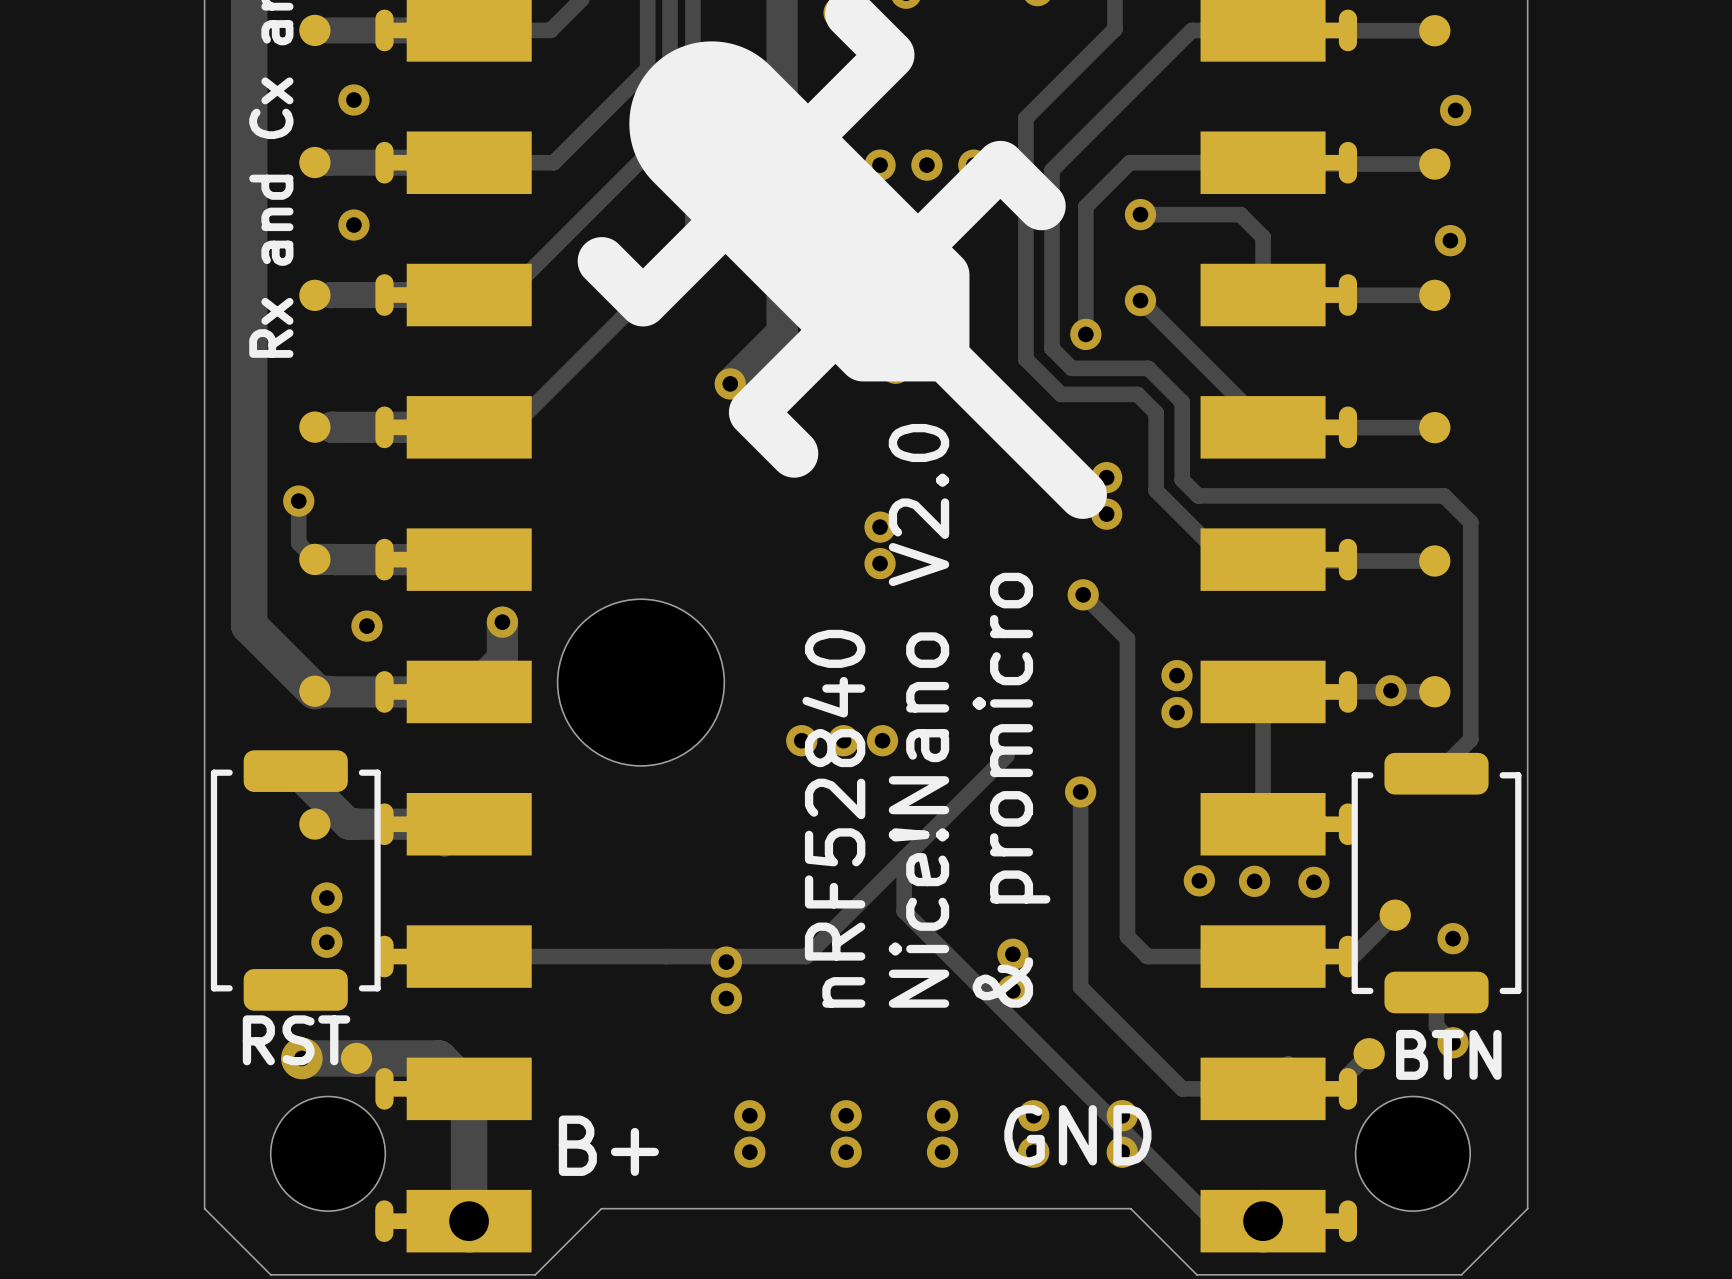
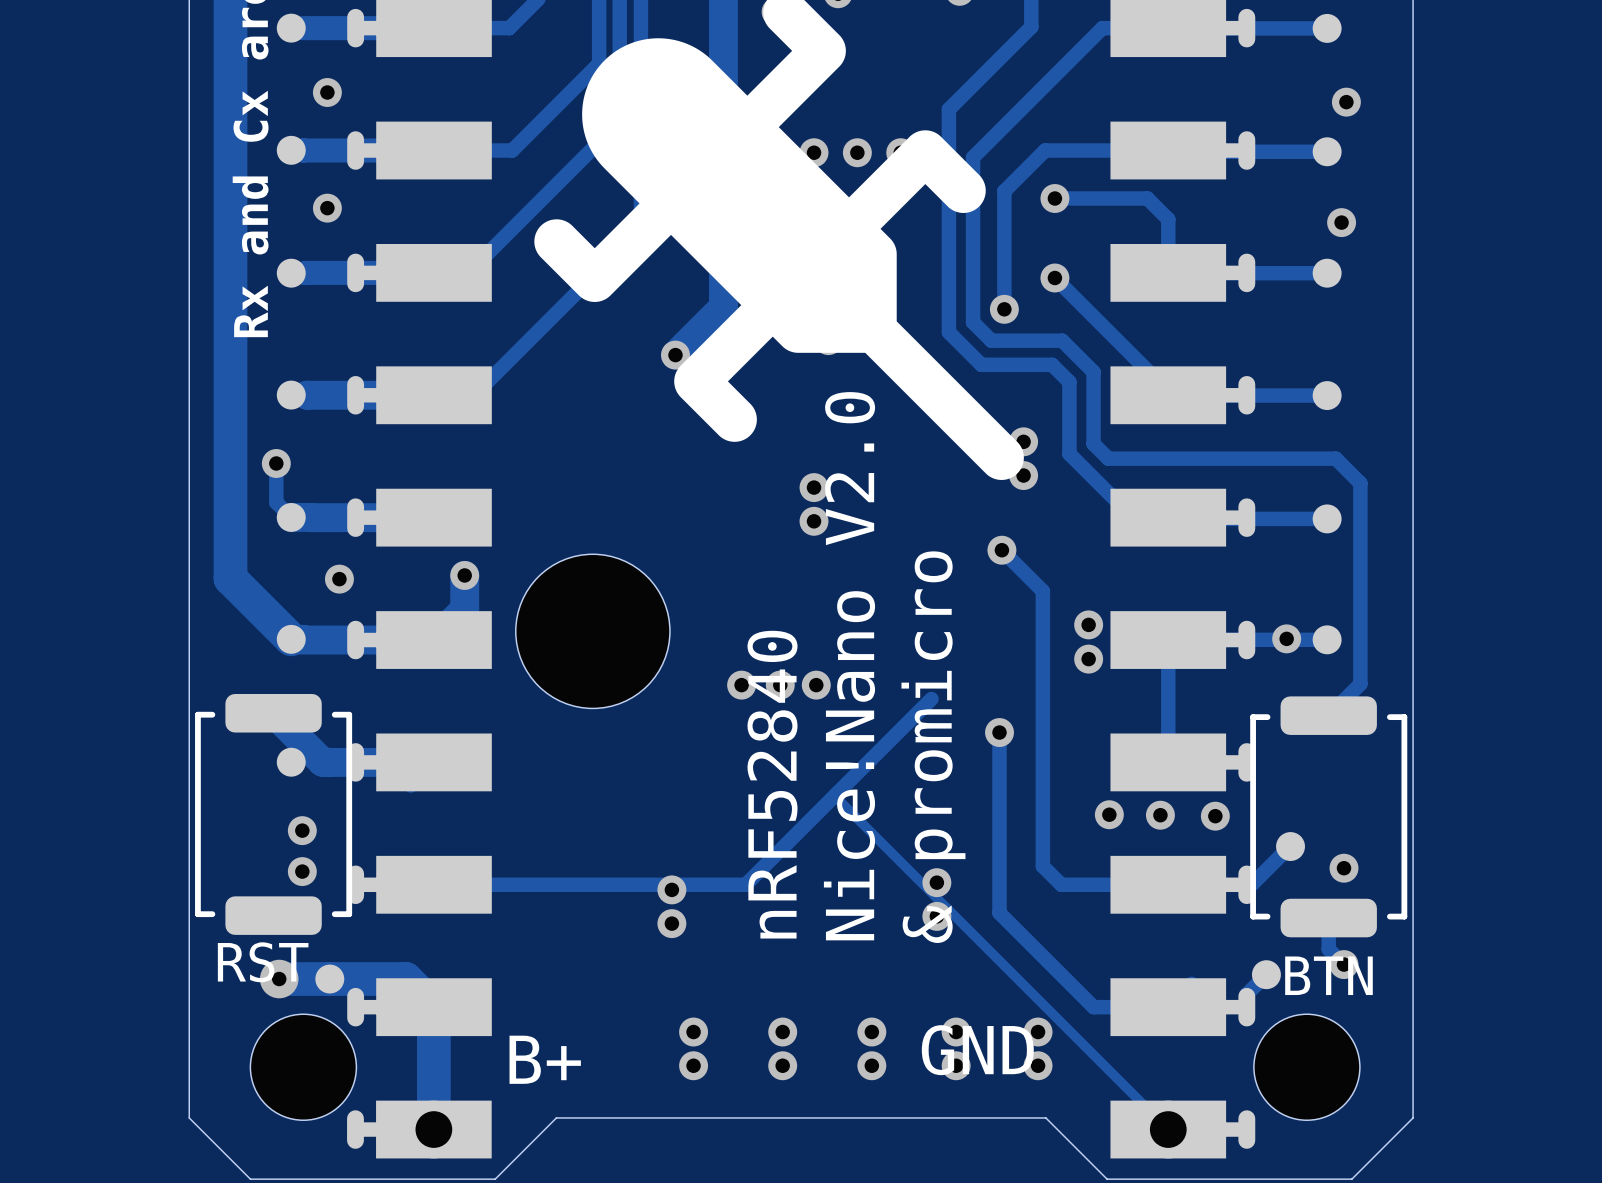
track: (904, 862) (904, 911) (1214, 1221) (1263, 1221) -> (836, 797) (1168, 1129)

